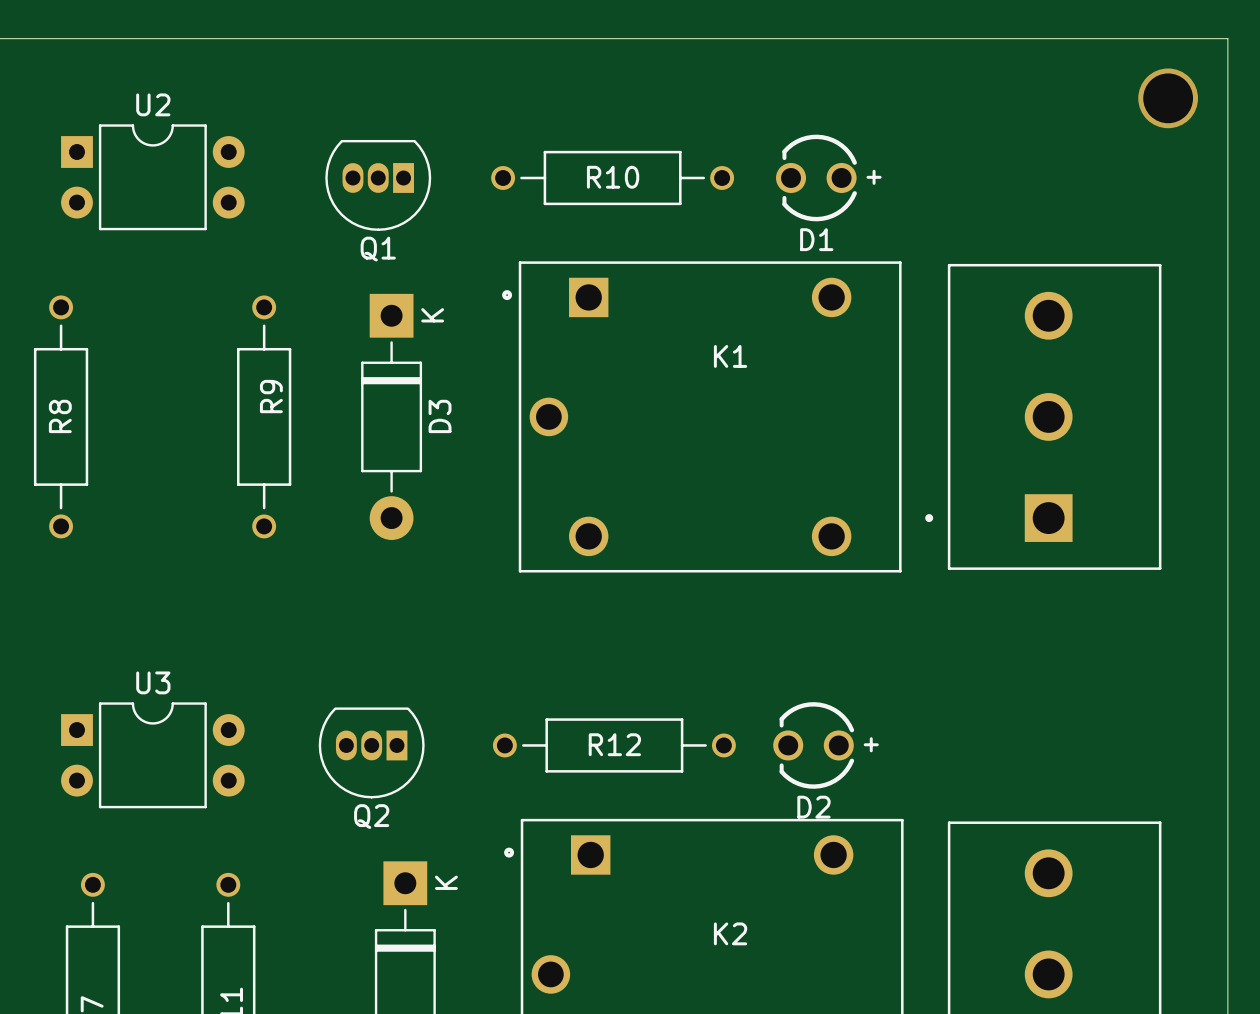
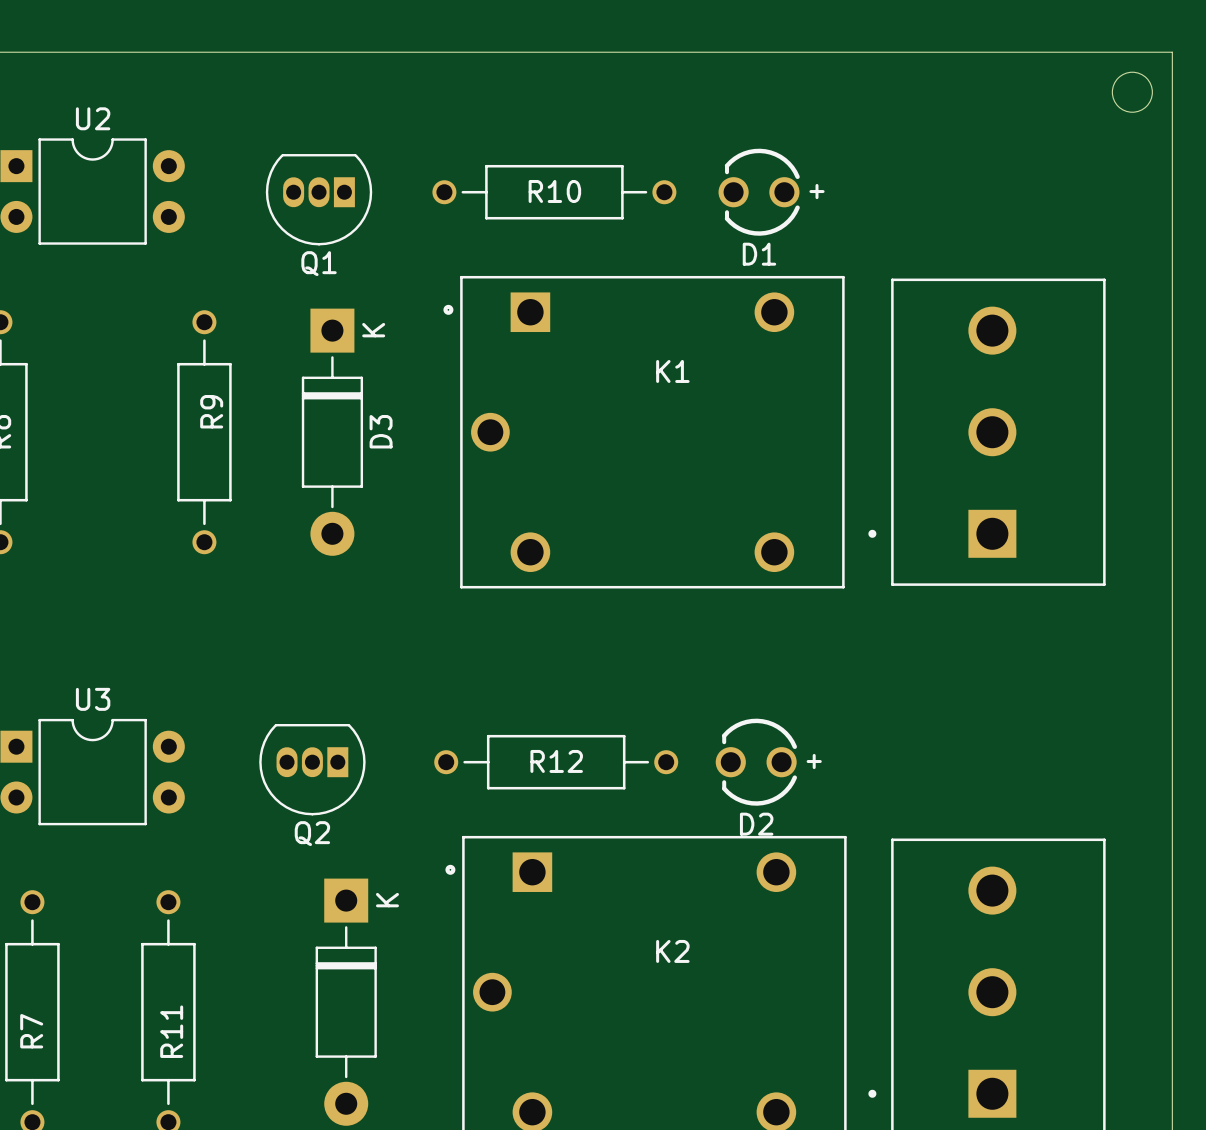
round board edge: none -> [1111, 71, 1153, 113]
via: (1168, 98) -> none

